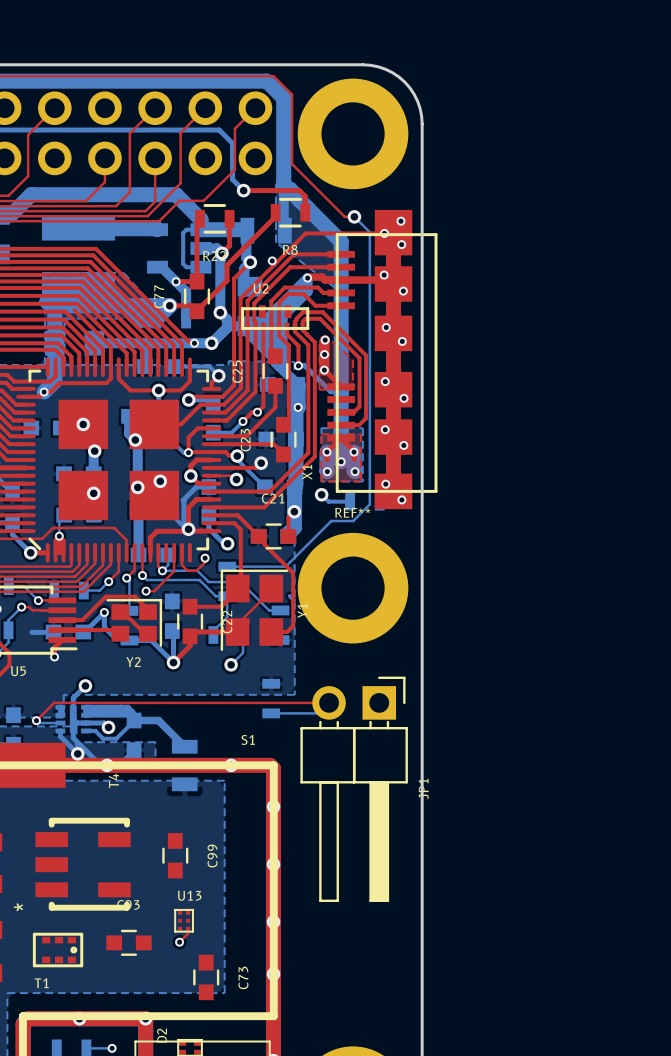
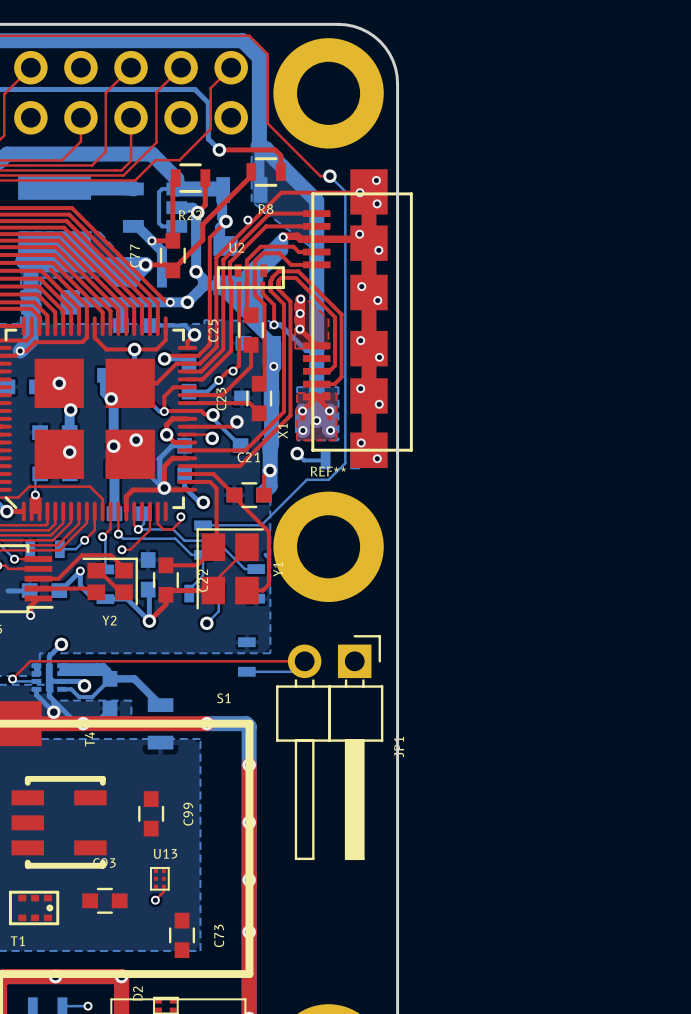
bottom track: none -> (206, 723) (246, 723) (249, 726) (249, 764)
top track: (231, 765) (270, 765) (273, 768) (273, 806) -> none

